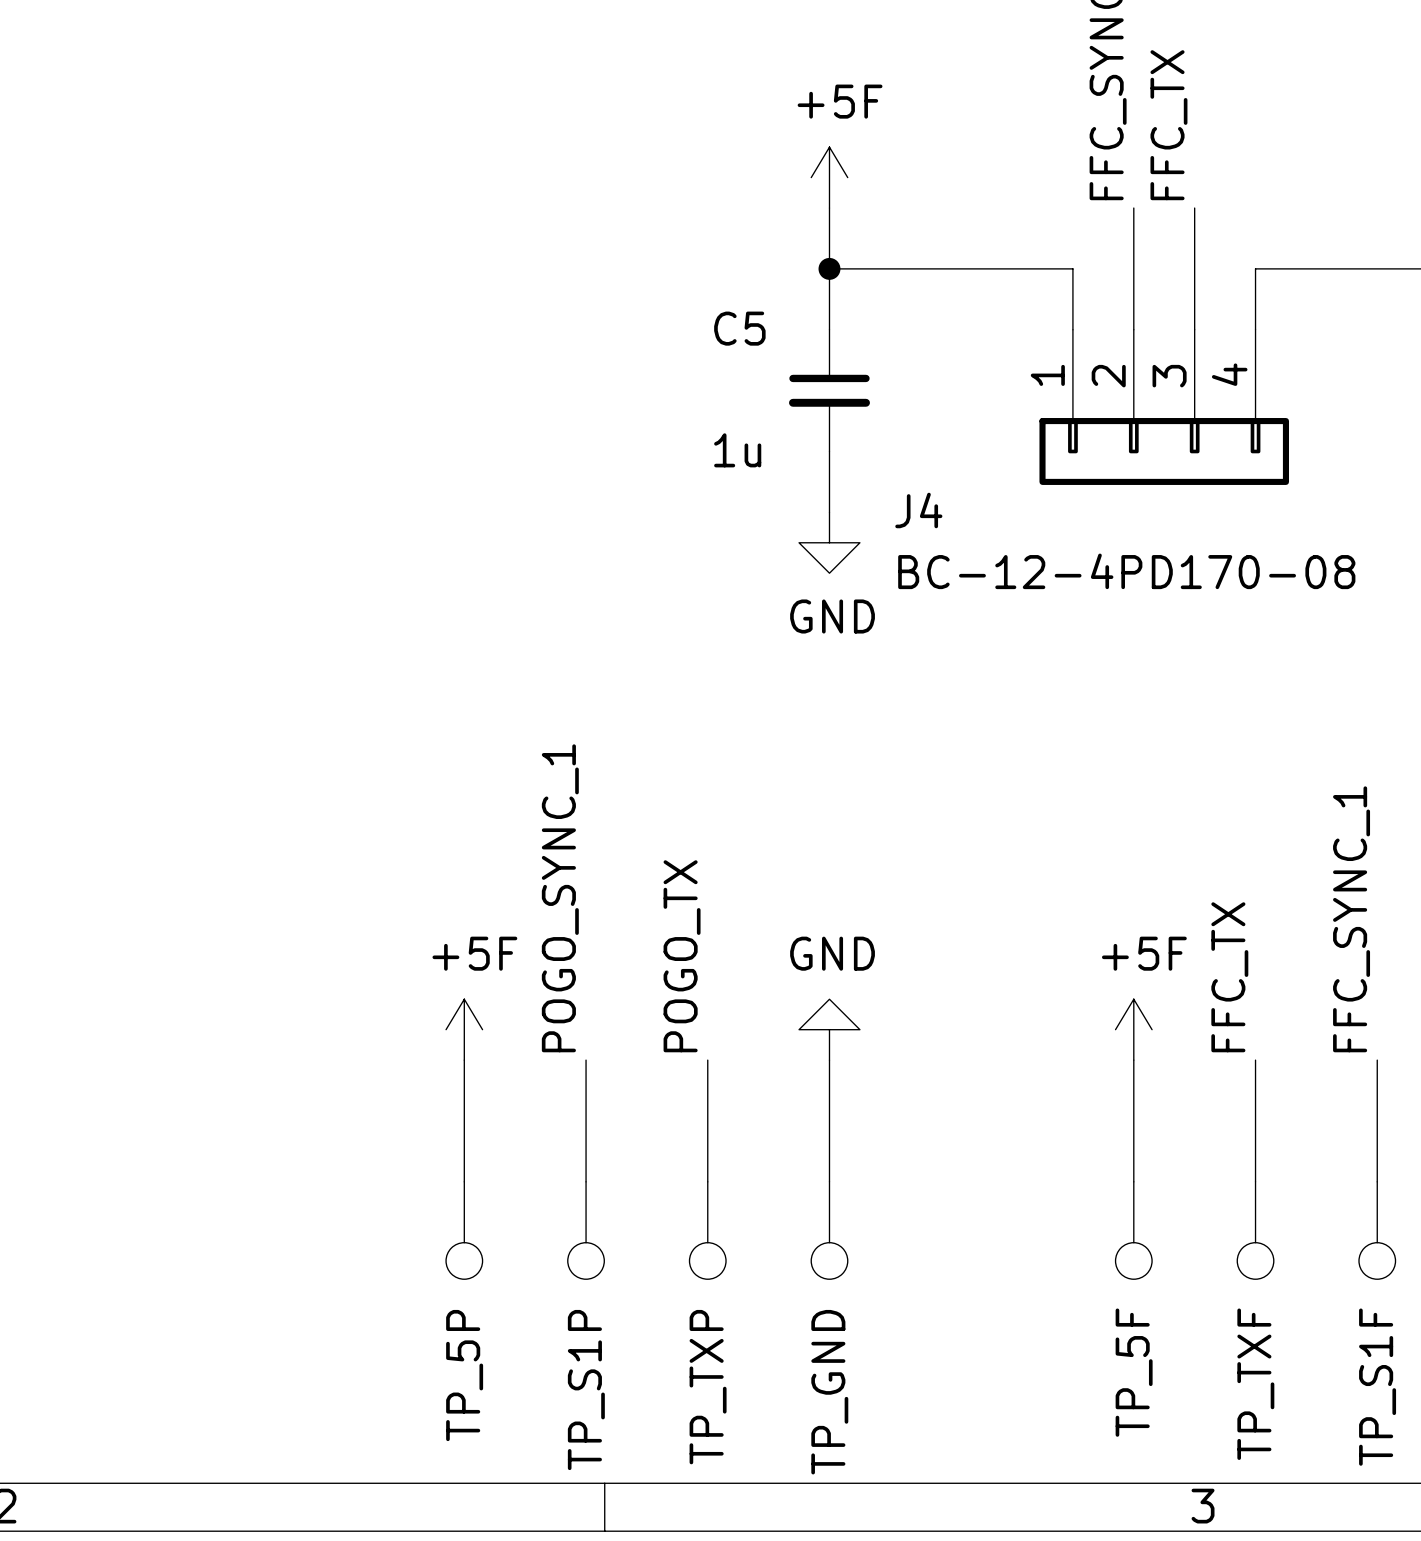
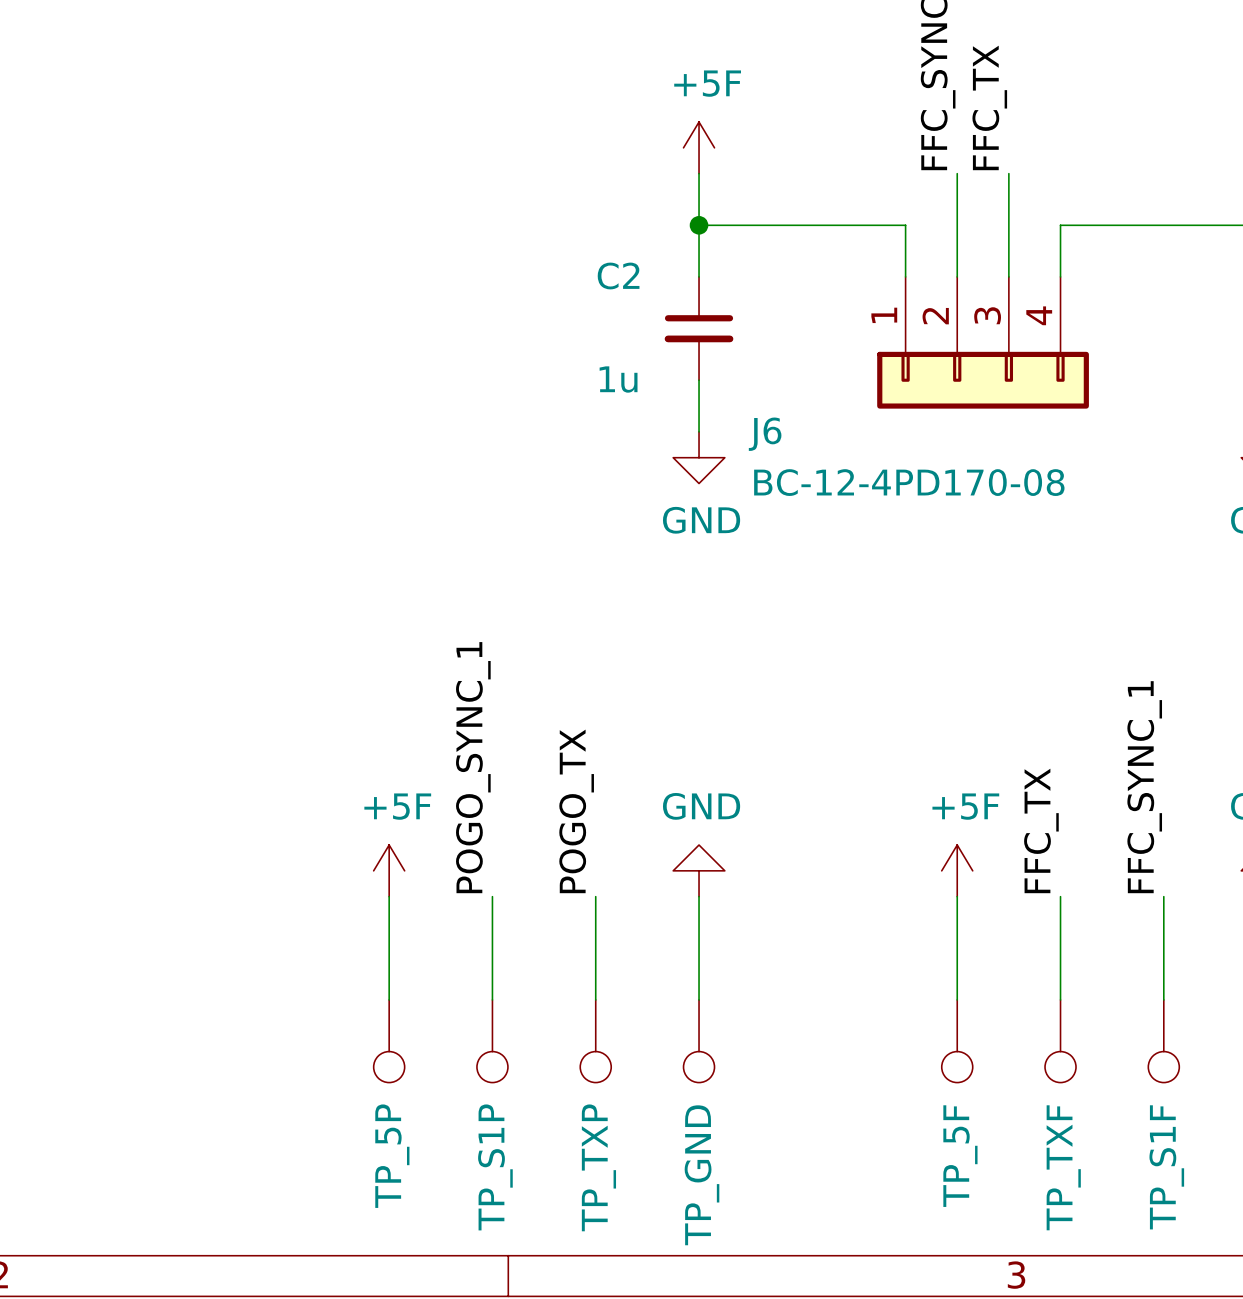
C5 name: C5 (739, 328) -> C2 (618, 276)
J4 name: J4 (918, 510) -> J6 (765, 434)

